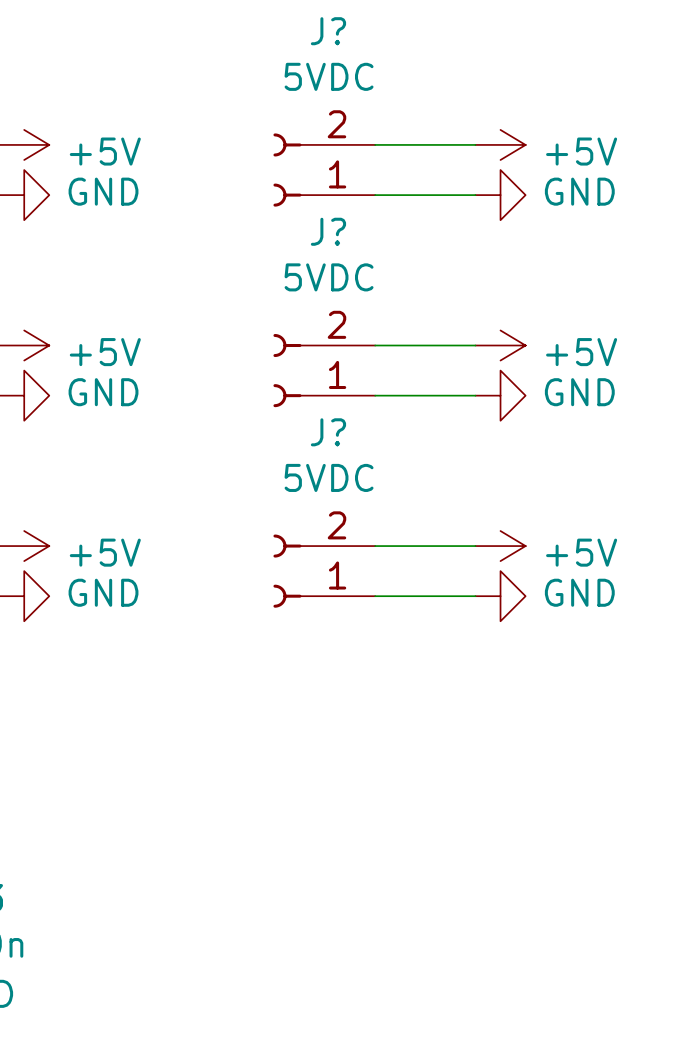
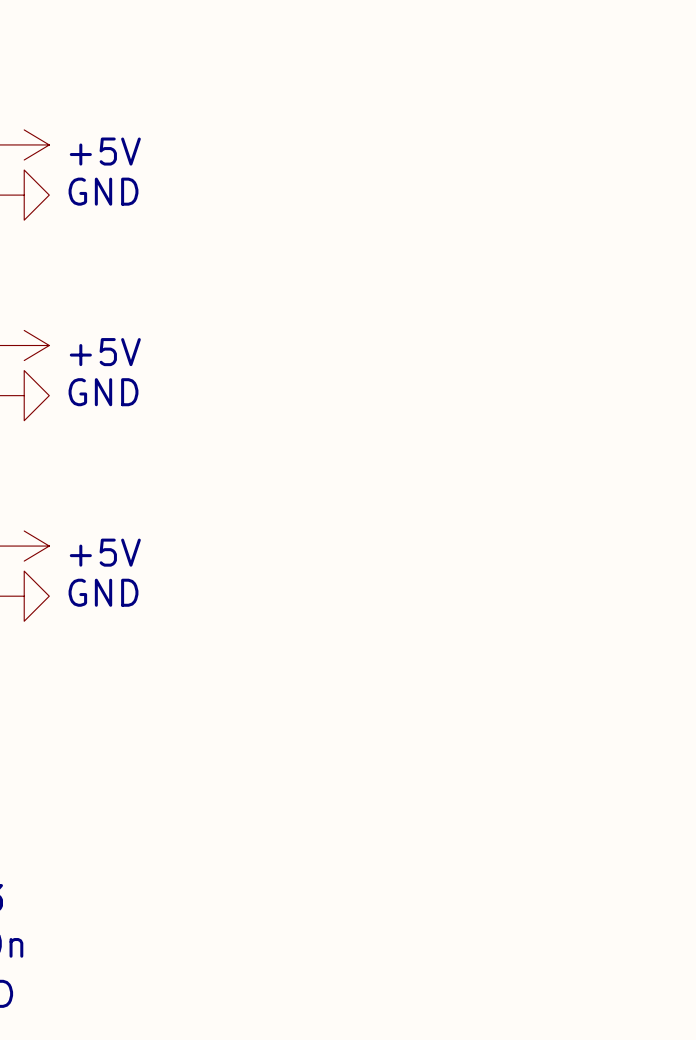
wire: (375, 144) (475, 144) -> none
power symbol: +5V (500, 144) -> none
J?: 5VDC (324, 170) -> none
wire: (375, 195) (475, 195) -> none
power symbol: GND (500, 195) -> none
wire: (375, 345) (475, 345) -> none
power symbol: +5V (500, 345) -> none
J?: 5VDC (324, 370) -> none
wire: (375, 395) (475, 395) -> none
power symbol: GND (500, 395) -> none
wire: (375, 546) (475, 546) -> none
power symbol: +5V (500, 546) -> none
J?: 5VDC (324, 571) -> none
wire: (375, 596) (475, 596) -> none
power symbol: GND (500, 596) -> none

